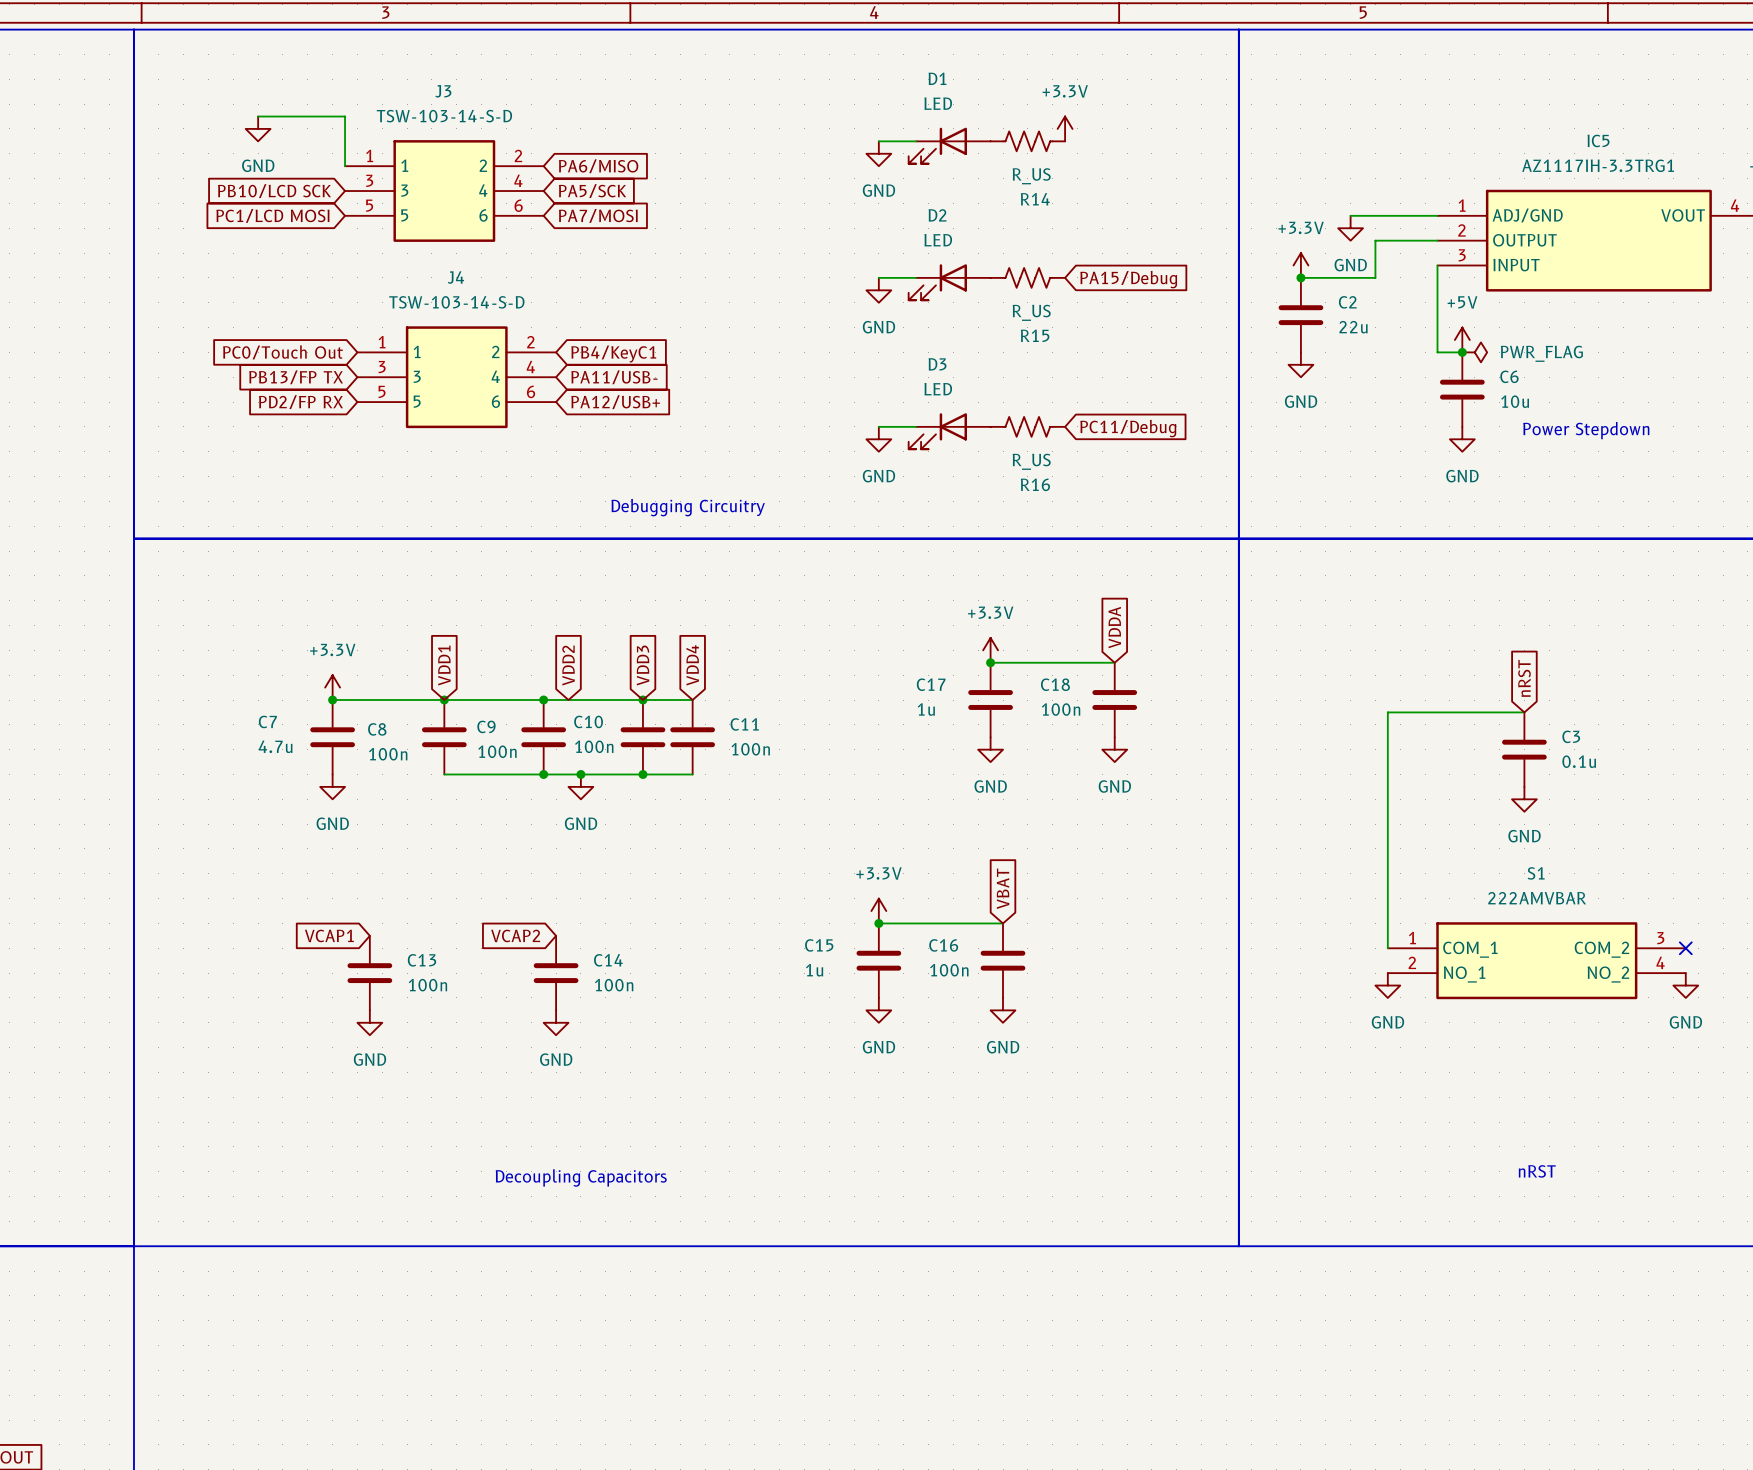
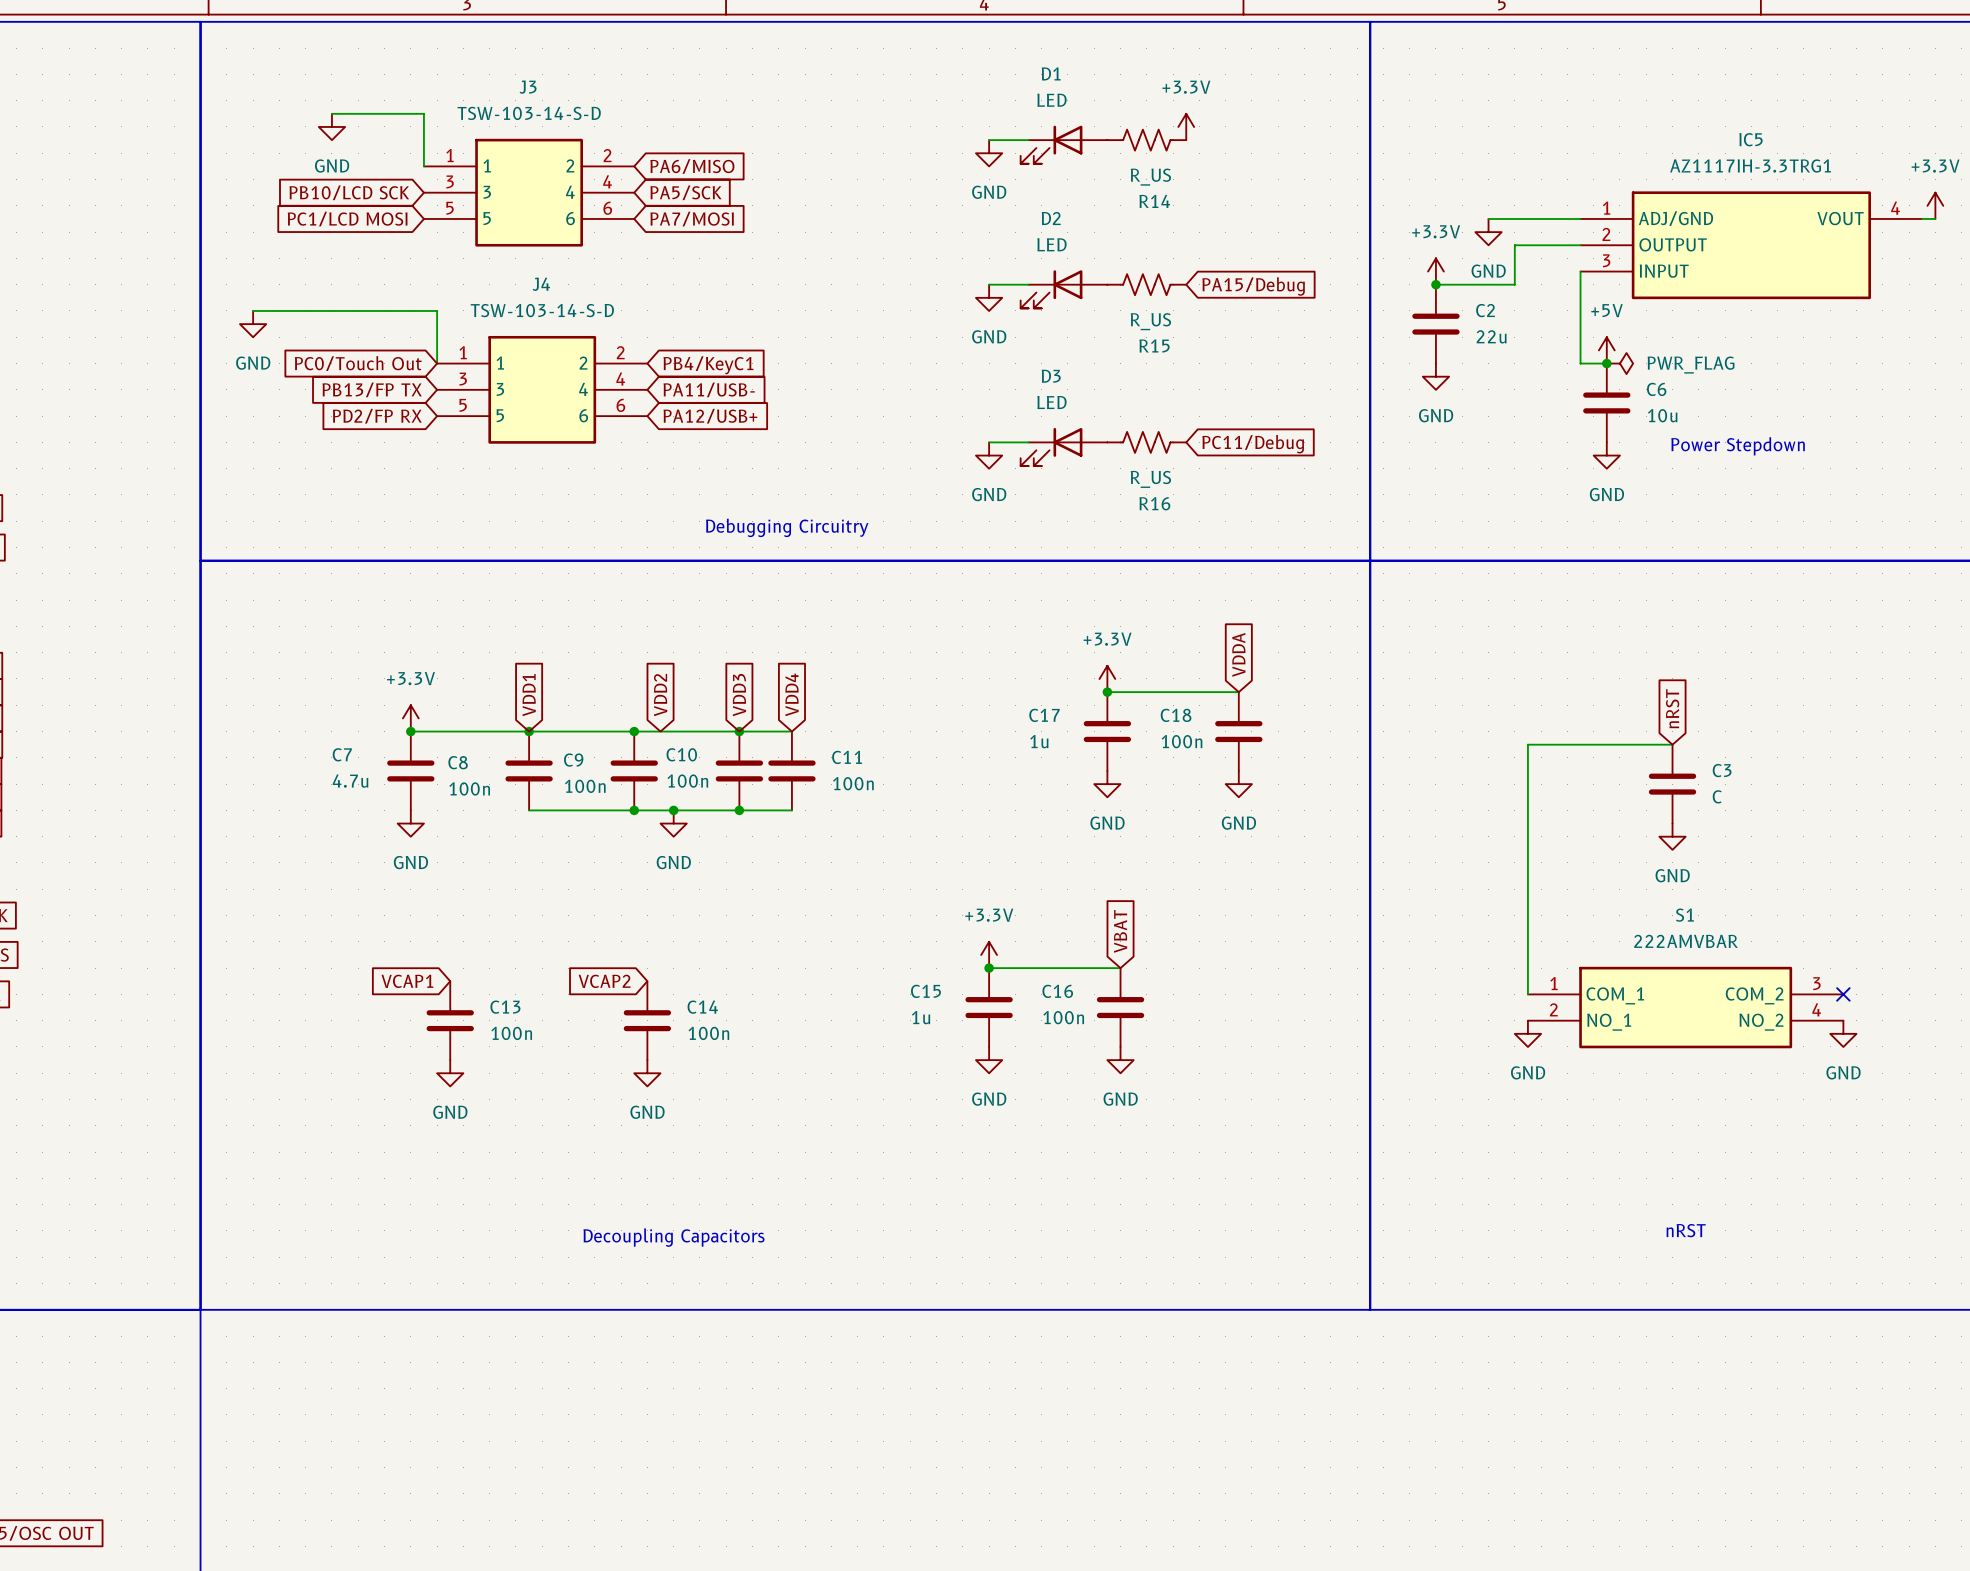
wire: none -> (253, 310) (437, 310) (437, 363)
power symbol: none -> GND (253, 324)
C3 value: 0.1u (1579, 761) -> C (1717, 796)

